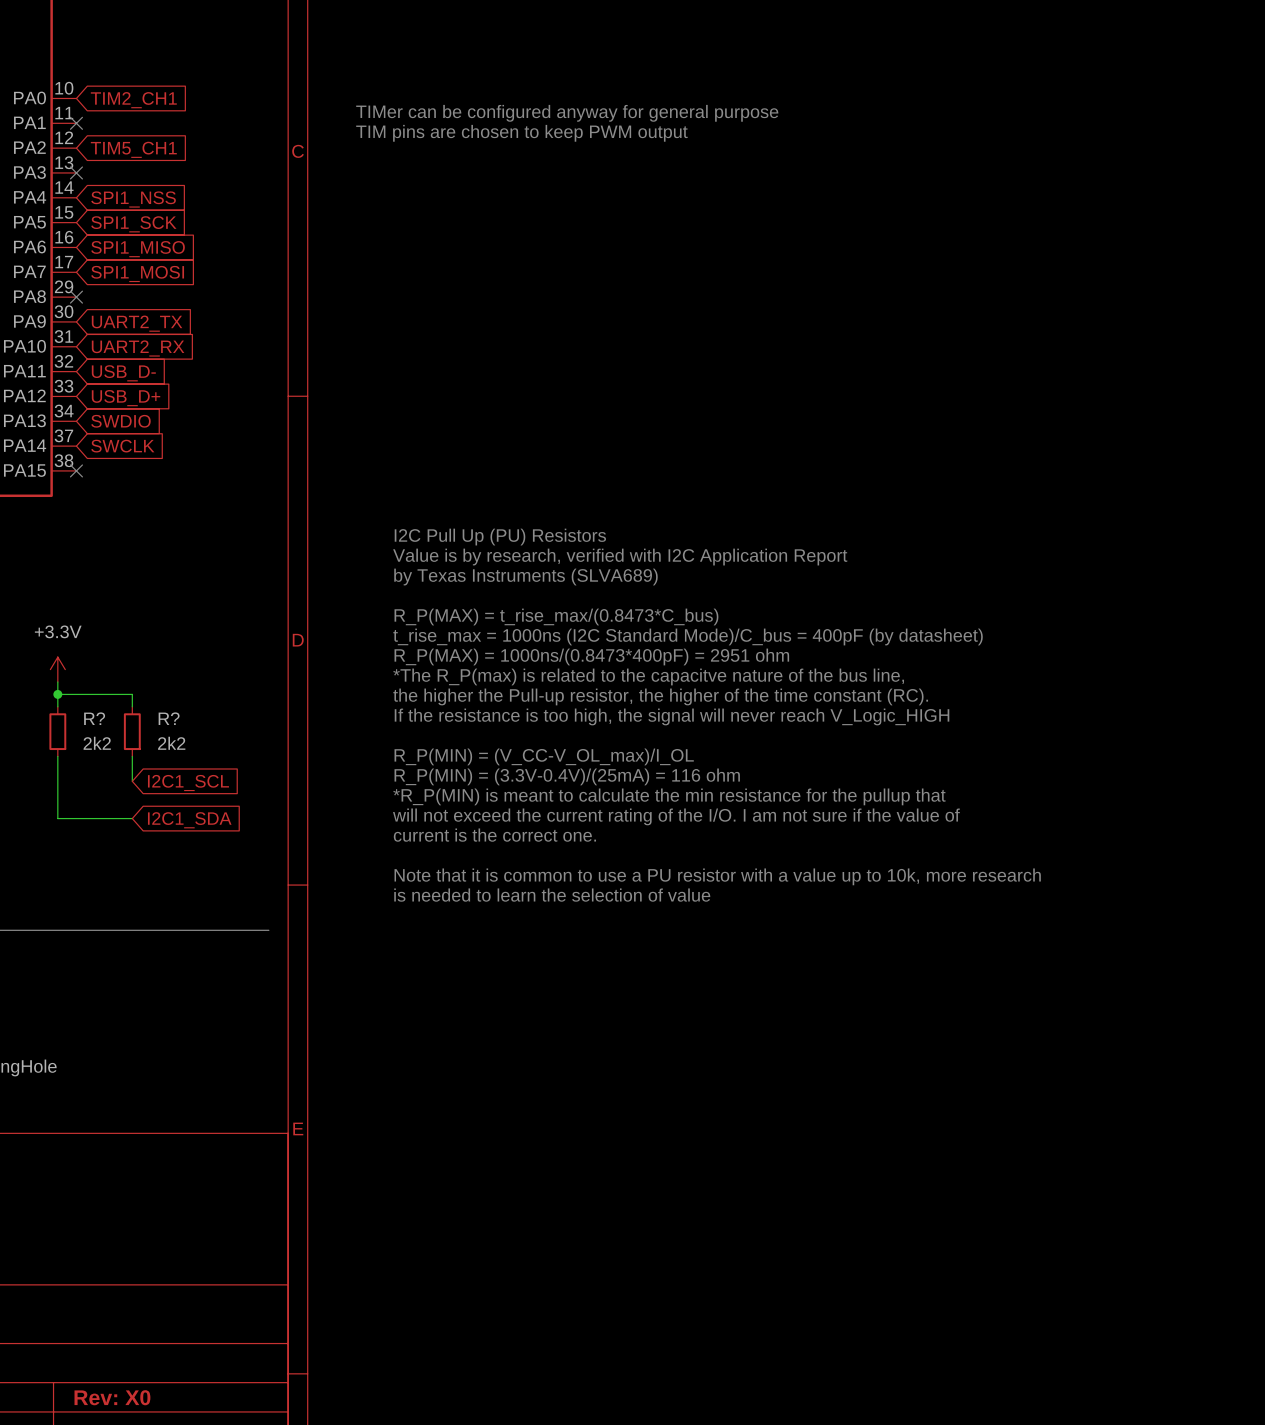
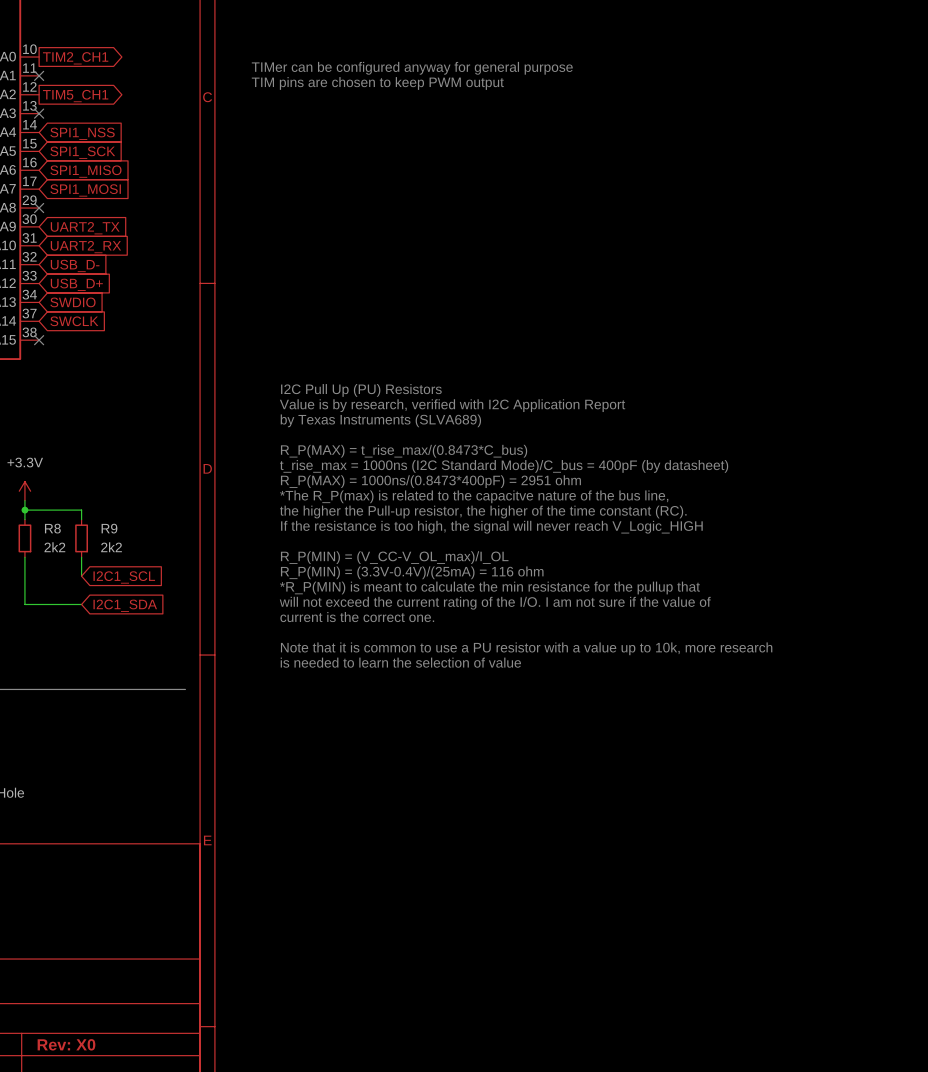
global label shape: input (133, 100) -> output (75, 58)
global label shape: input (133, 149) -> output (75, 96)
R? name: R? (94, 718) -> R8 (52, 528)
R? name: R? (169, 718) -> R9 (109, 528)

